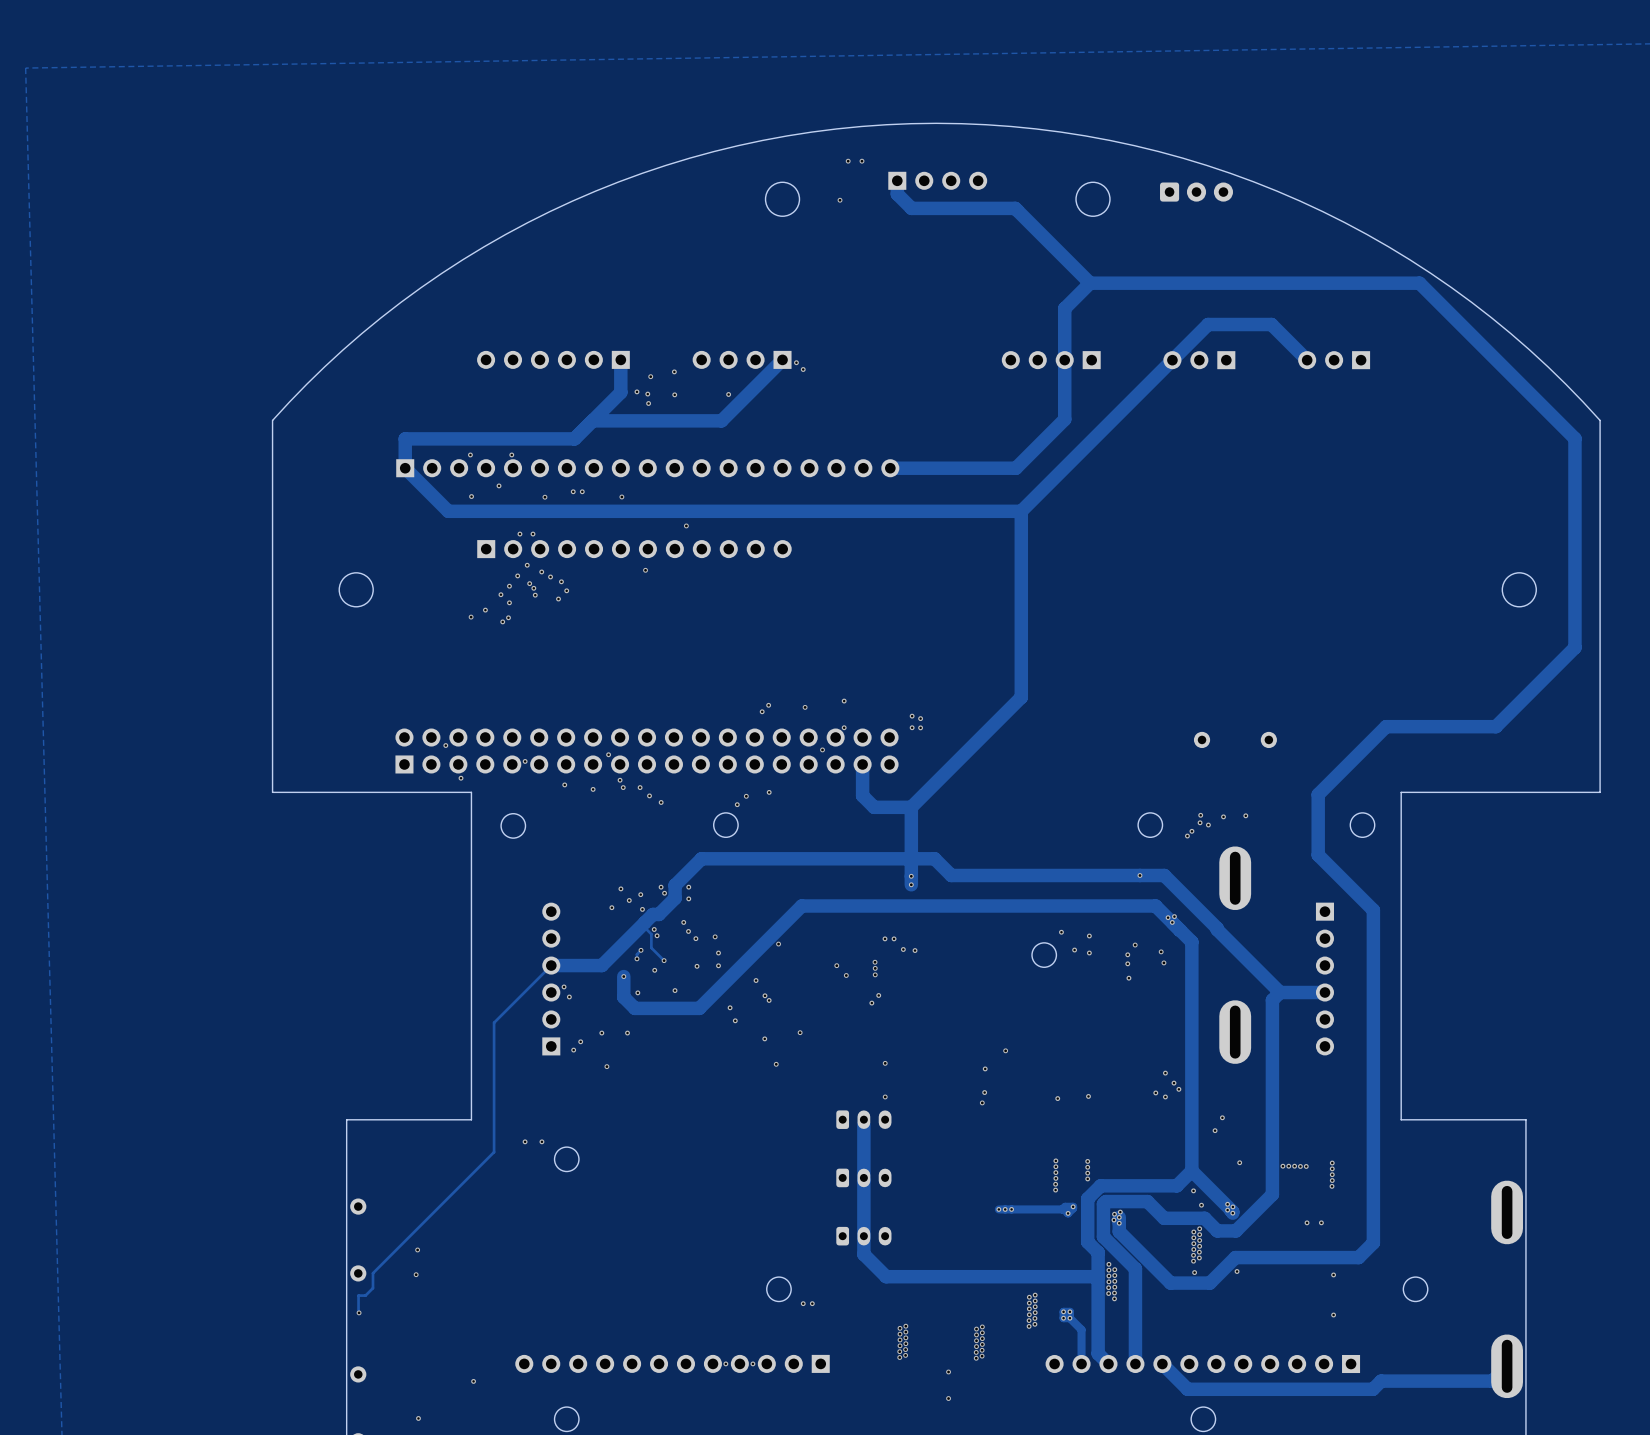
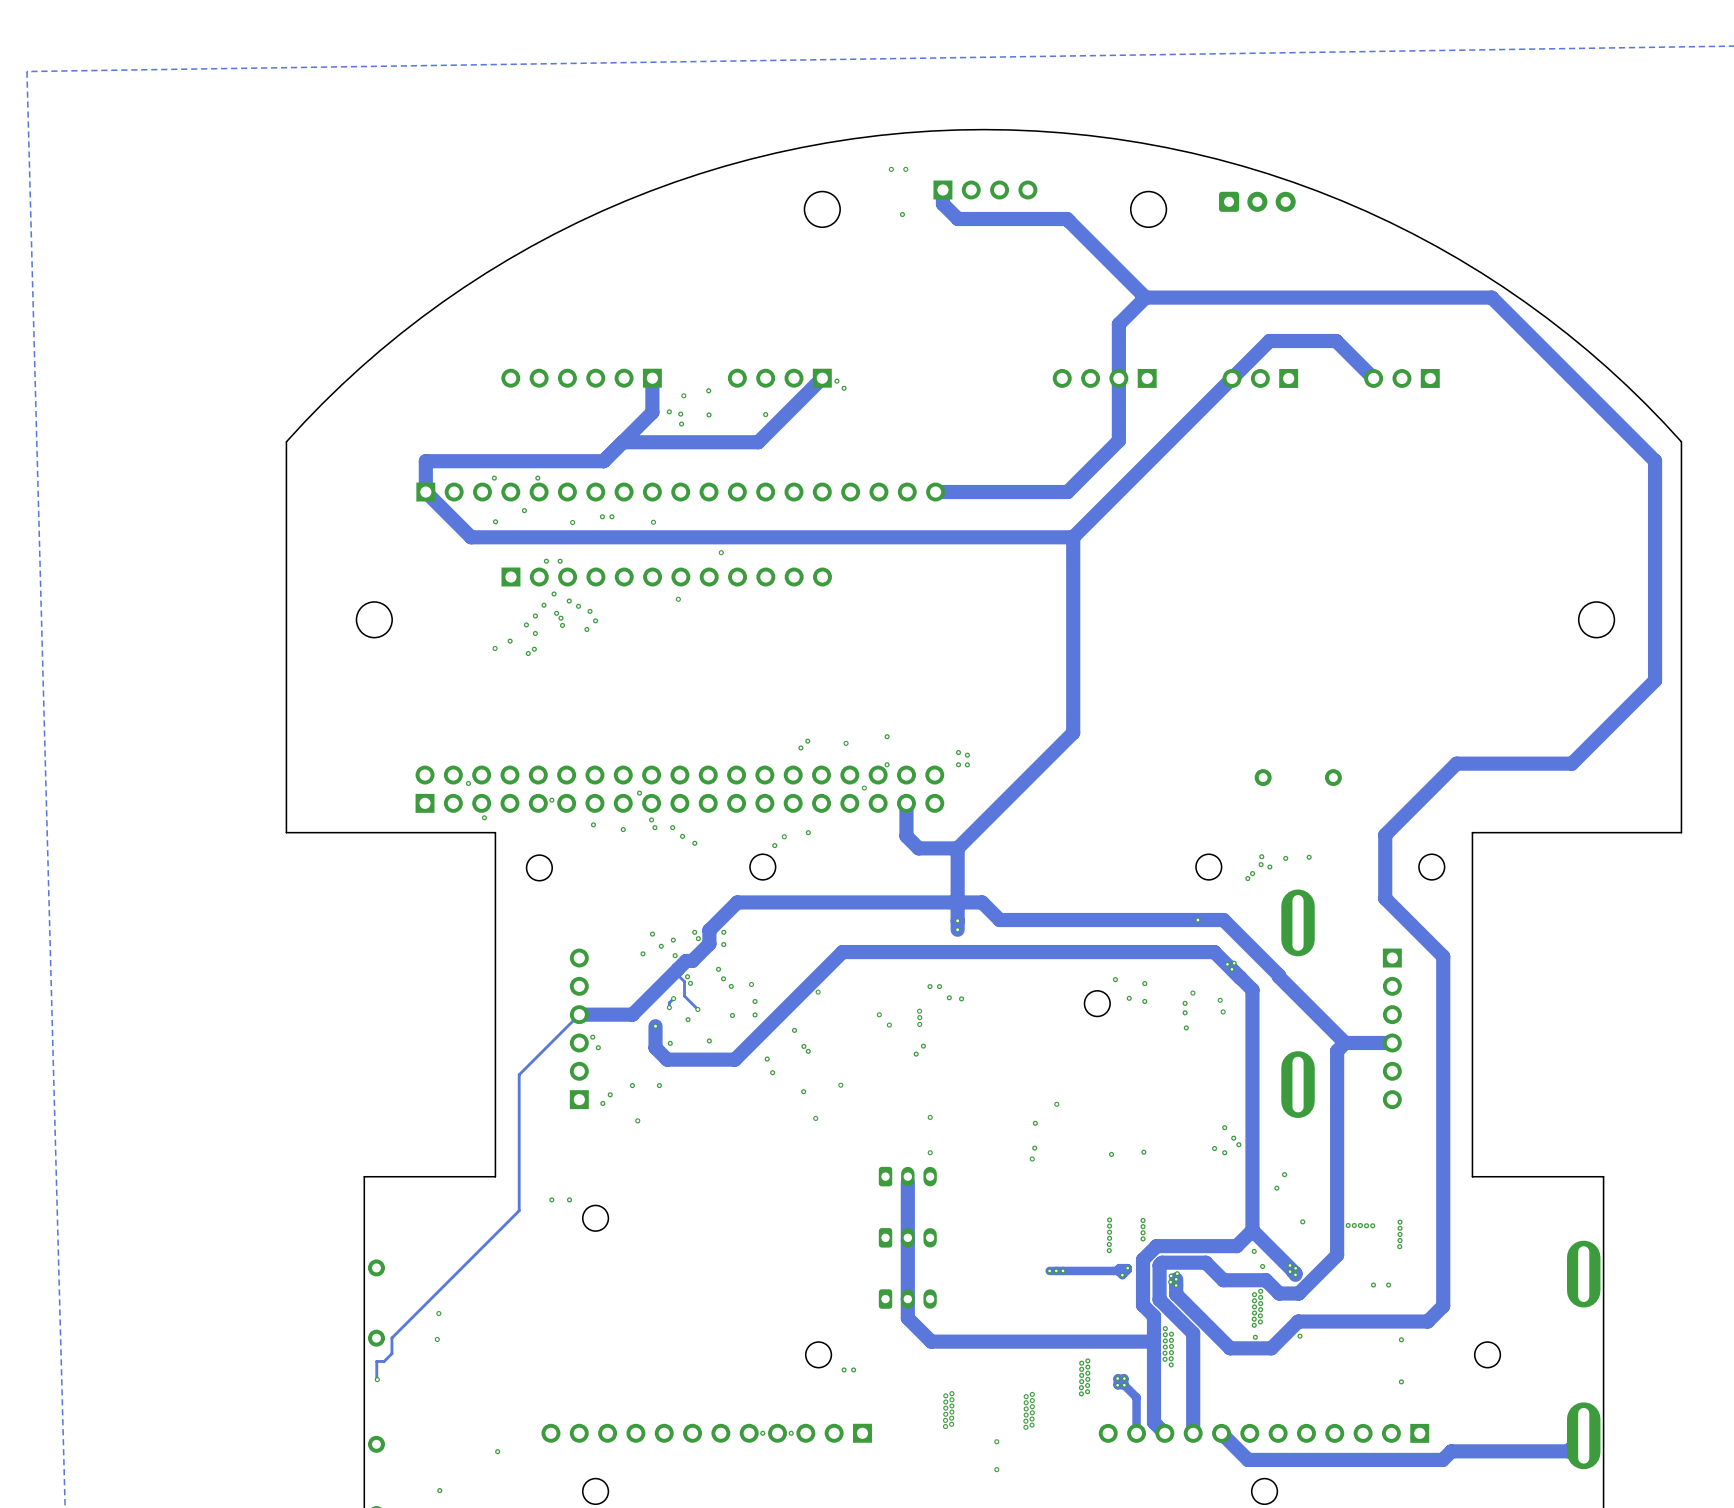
via: (840, 200) -> none
via: none -> (902, 214)

